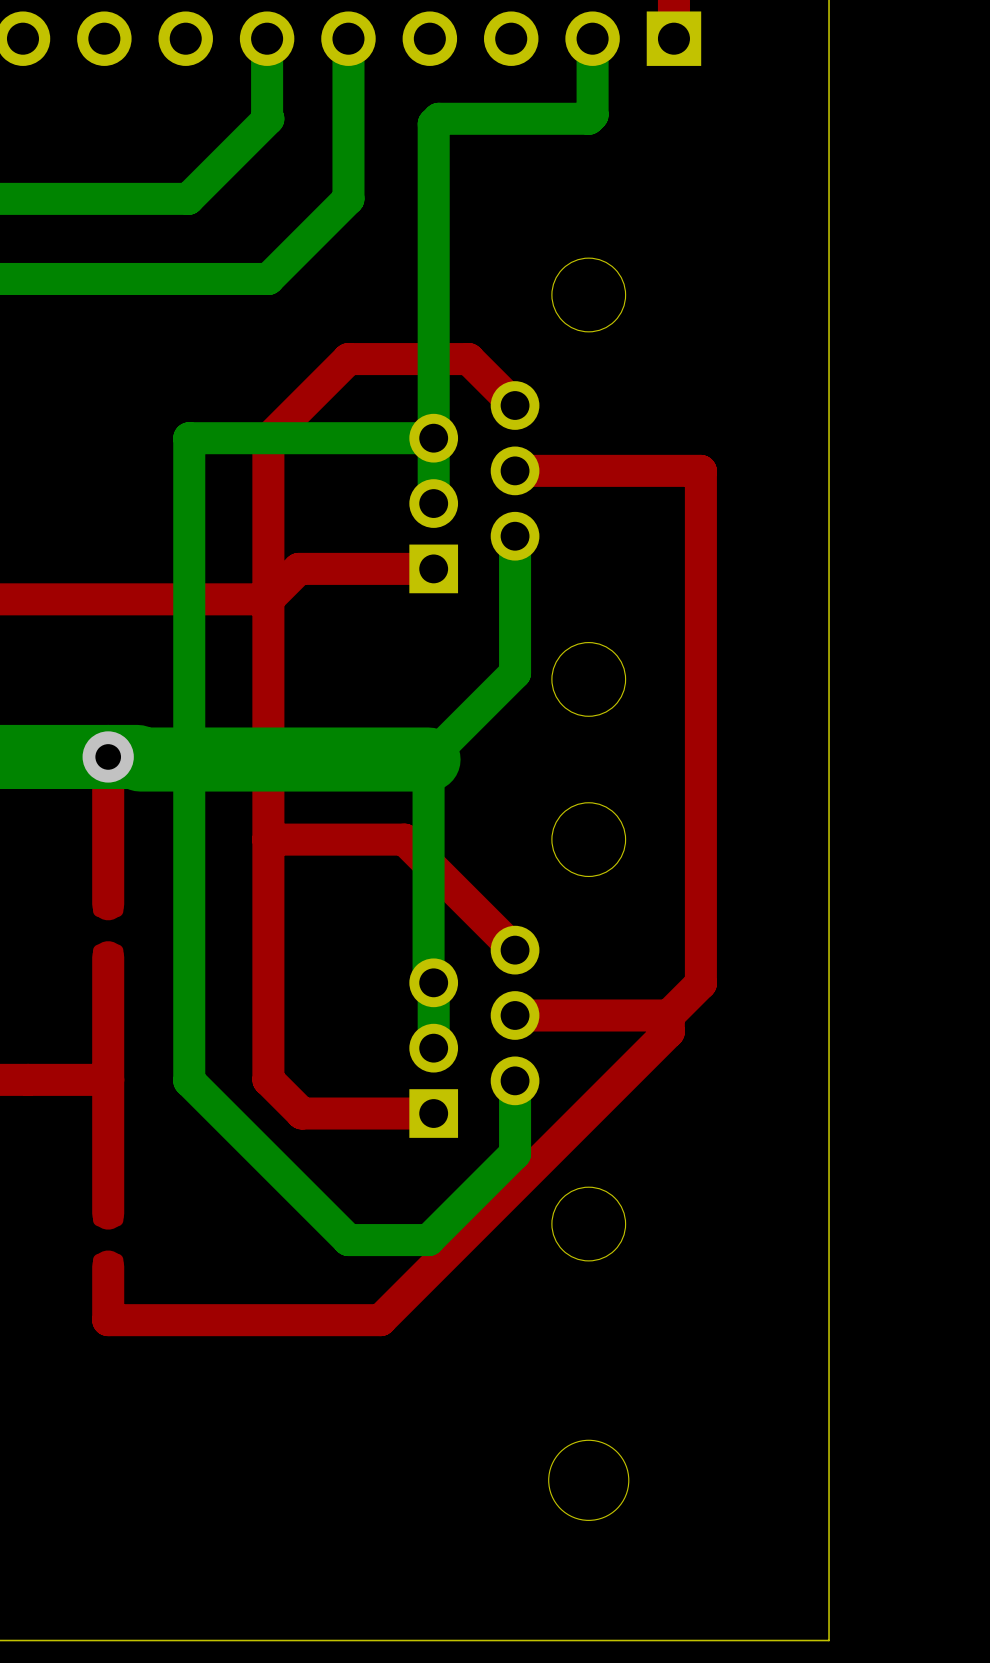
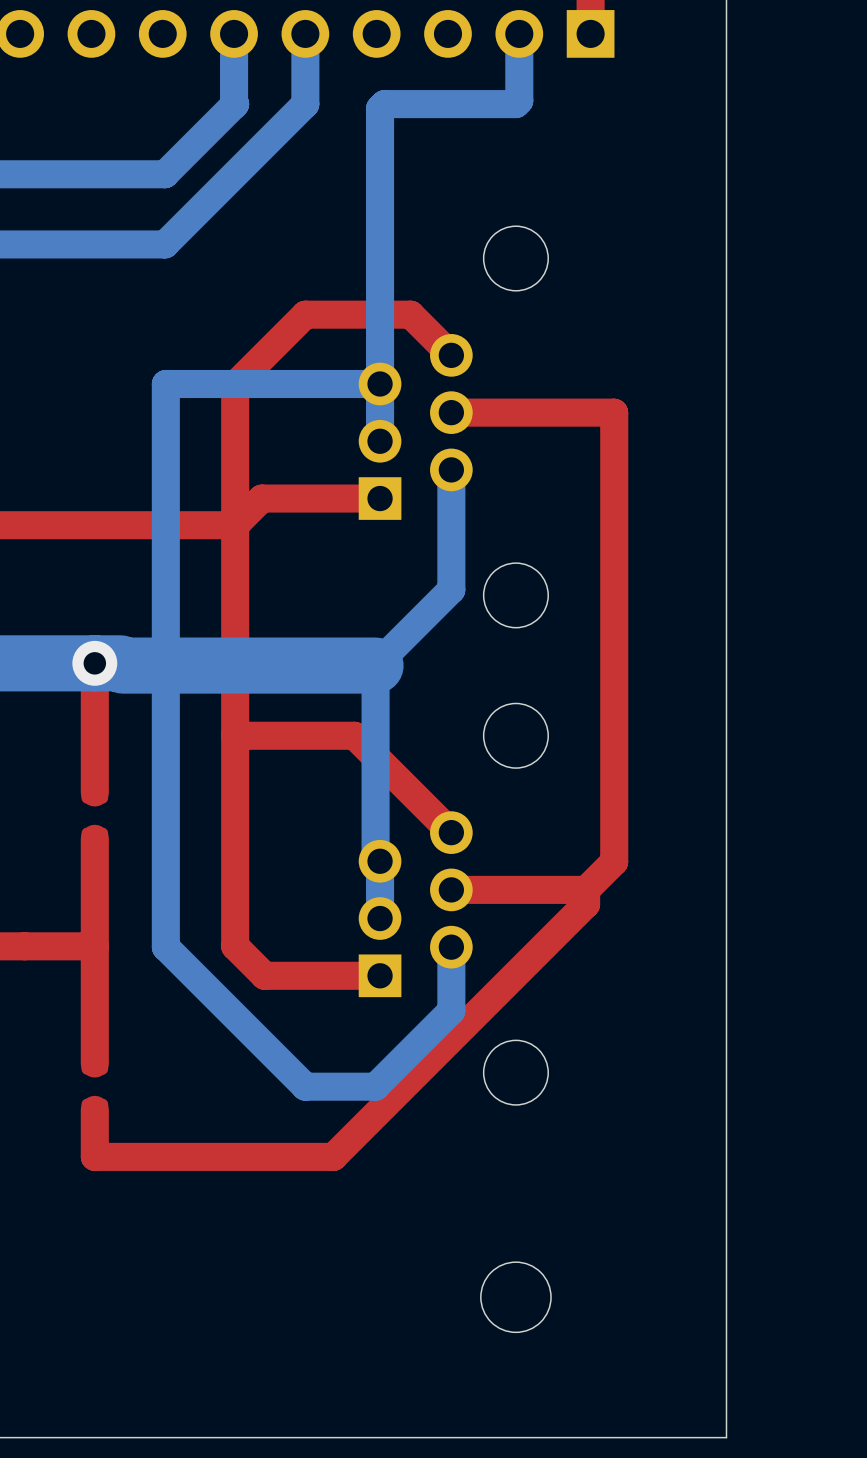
bottom track: (348, 118) (348, 198) (268, 278) (188, 278) -> (305, 104) (165, 244)

